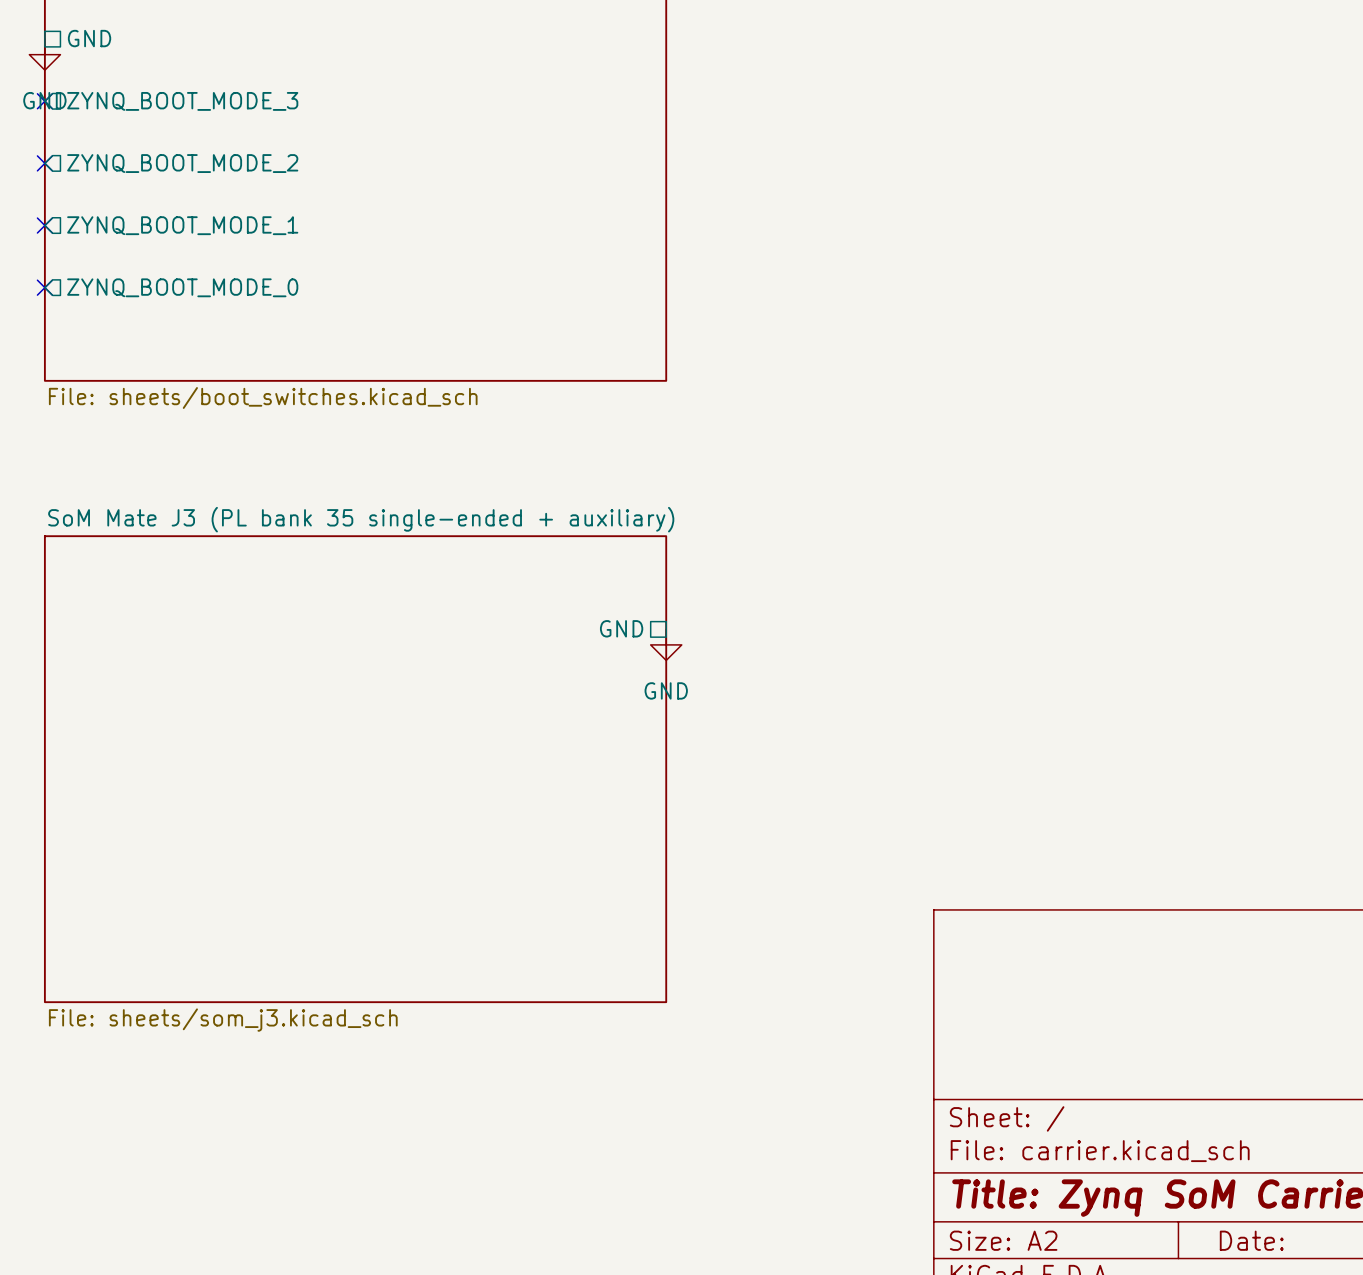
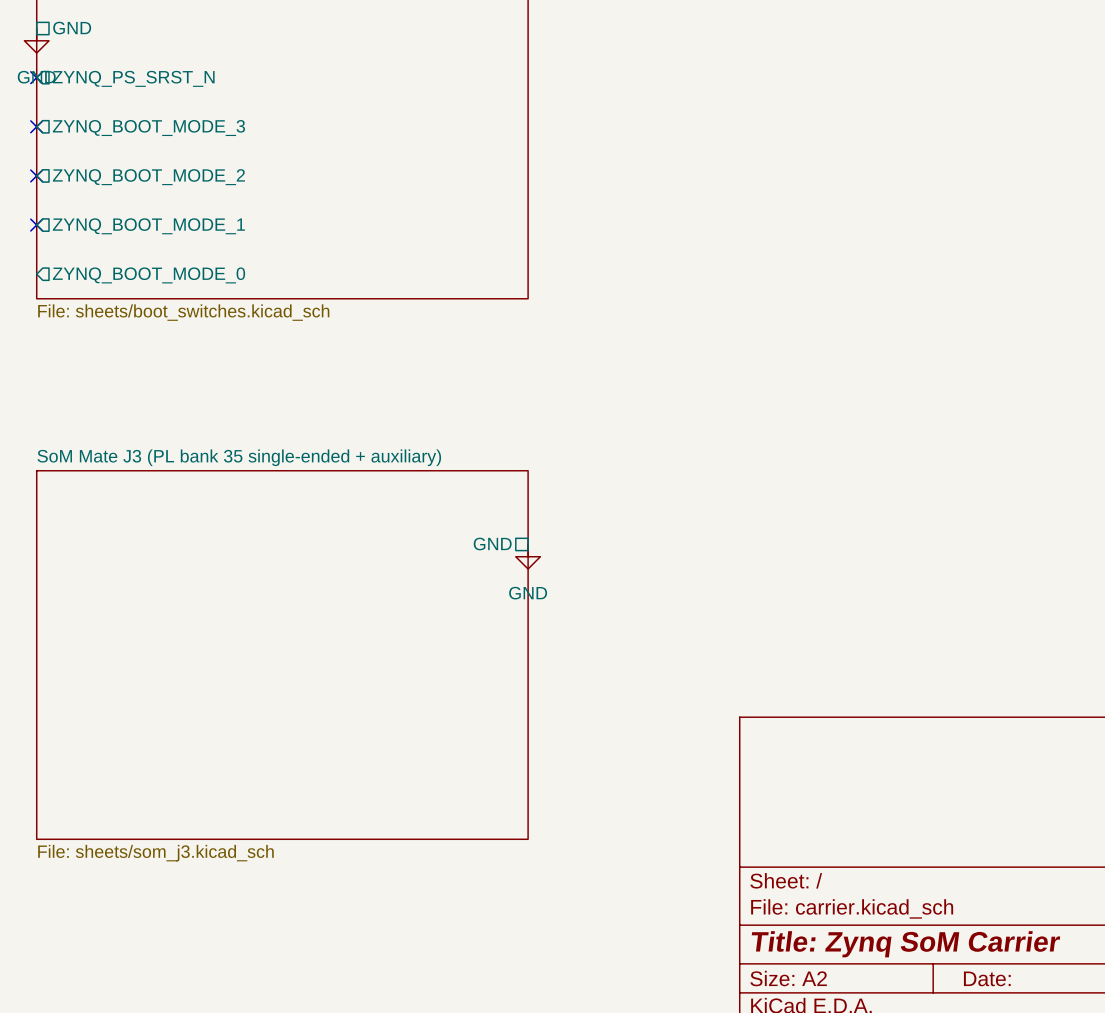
sheet pin: ZYNQ_BOOT_MODE_3 (182, 101) -> ZYNQ_PS_SRST_N (133, 78)
sheet pin: ZYNQ_BOOT_MODE_2 (182, 163) -> ZYNQ_BOOT_MODE_3 (148, 128)
sheet pin: ZYNQ_BOOT_MODE_1 (182, 225) -> ZYNQ_BOOT_MODE_2 (148, 177)
sheet pin: ZYNQ_BOOT_MODE_0 (182, 287) -> ZYNQ_BOOT_MODE_1 (148, 226)
sheet pin: none -> ZYNQ_BOOT_MODE_0 (148, 275)
sheet pin position: GND (621, 628) -> GND (492, 543)
power symbol position: GND (666, 644) -> GND (528, 556)
sheet SoM Mate J3 (PL bank 35 single-ended + auxiliary) position: (355, 769) -> (282, 655)

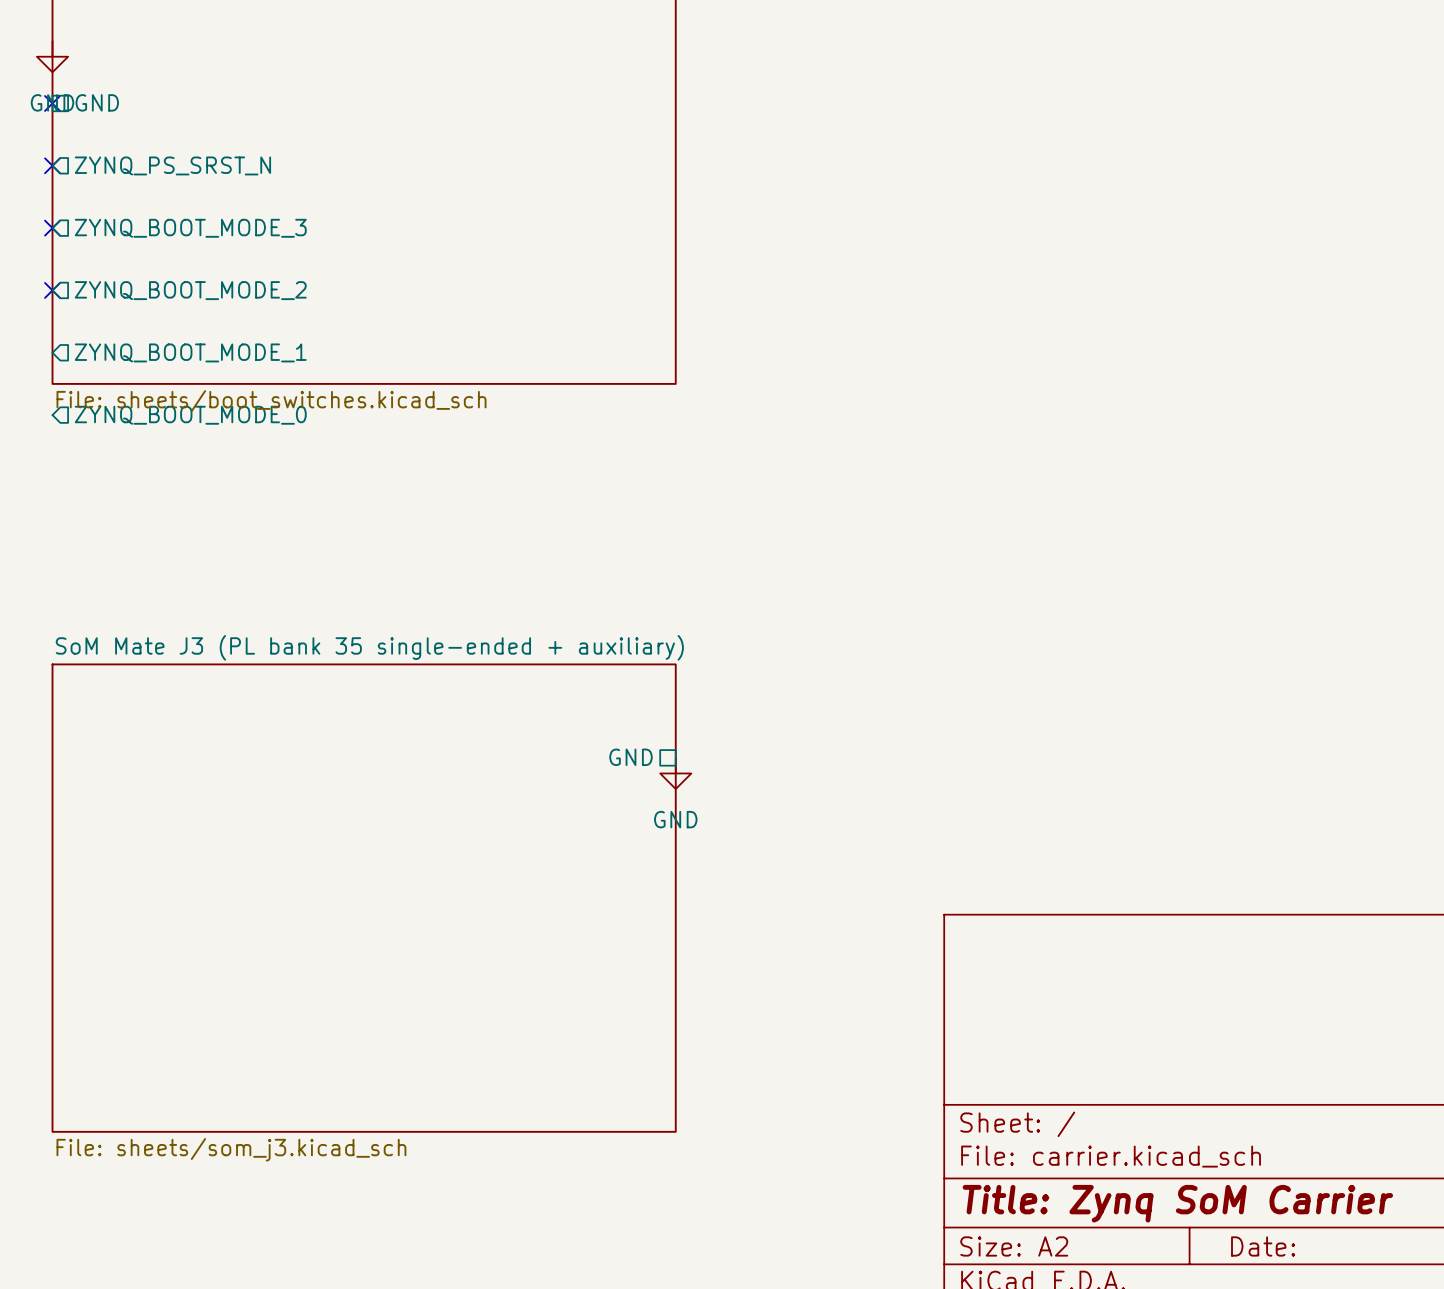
sheet pin: GND (72, 28) -> none
sheet pin shape: output (133, 78) -> passive (97, 102)
sheet pin: ZYNQ_PS_SRST_N (133, 78) -> GND (97, 102)
sheet pin: ZYNQ_BOOT_MODE_3 (148, 128) -> ZYNQ_PS_SRST_N (172, 165)
sheet pin: ZYNQ_BOOT_MODE_2 (148, 177) -> ZYNQ_BOOT_MODE_3 (190, 228)
sheet pin: ZYNQ_BOOT_MODE_1 (148, 226) -> ZYNQ_BOOT_MODE_2 (190, 290)
sheet pin: ZYNQ_BOOT_MODE_0 (148, 275) -> ZYNQ_BOOT_MODE_1 (190, 352)
sheet pin: none -> ZYNQ_BOOT_MODE_0 (190, 415)
sheet pin position: GND (492, 543) -> GND (631, 757)
power symbol position: GND (528, 556) -> GND (675, 773)
sheet SoM Mate J3 (PL bank 35 single-ended + auxiliary) position: (282, 655) -> (364, 898)

